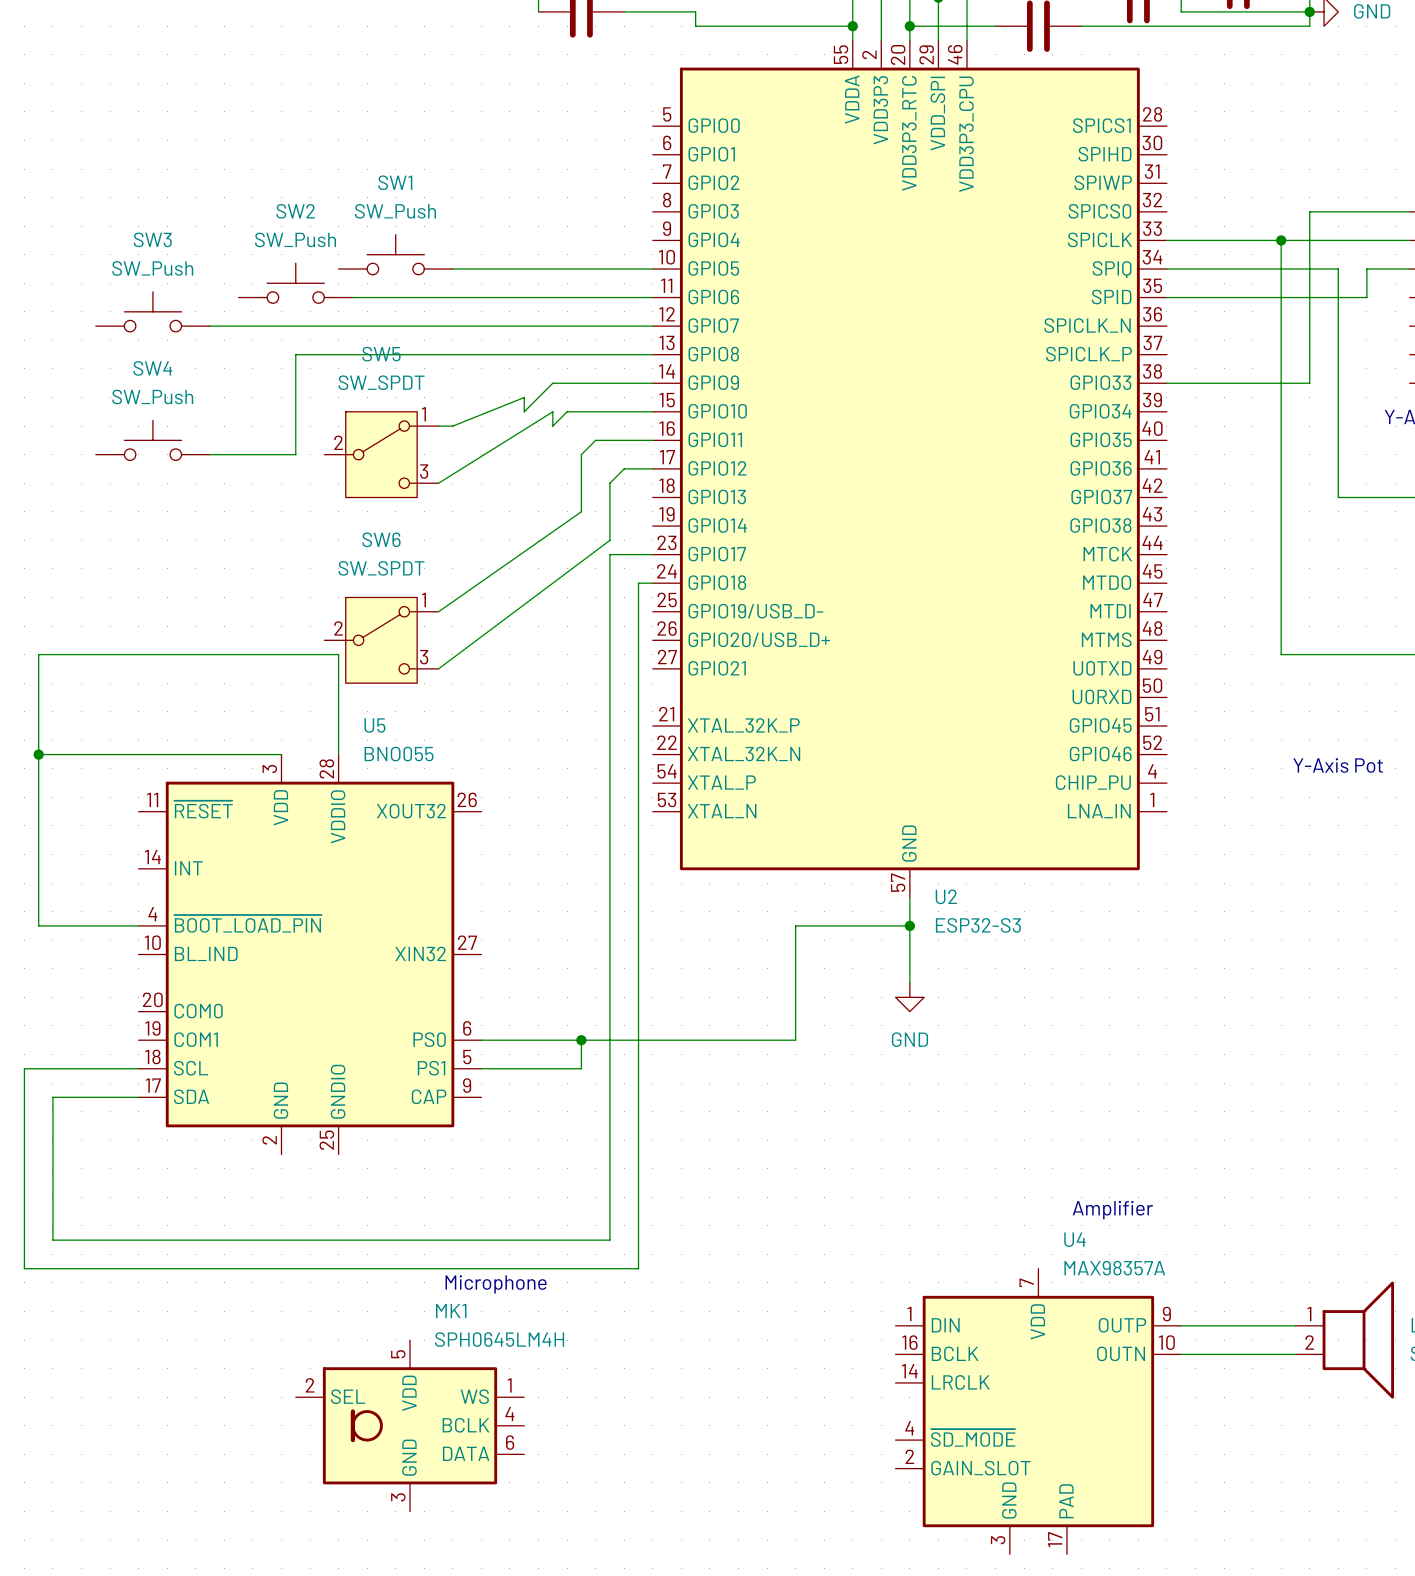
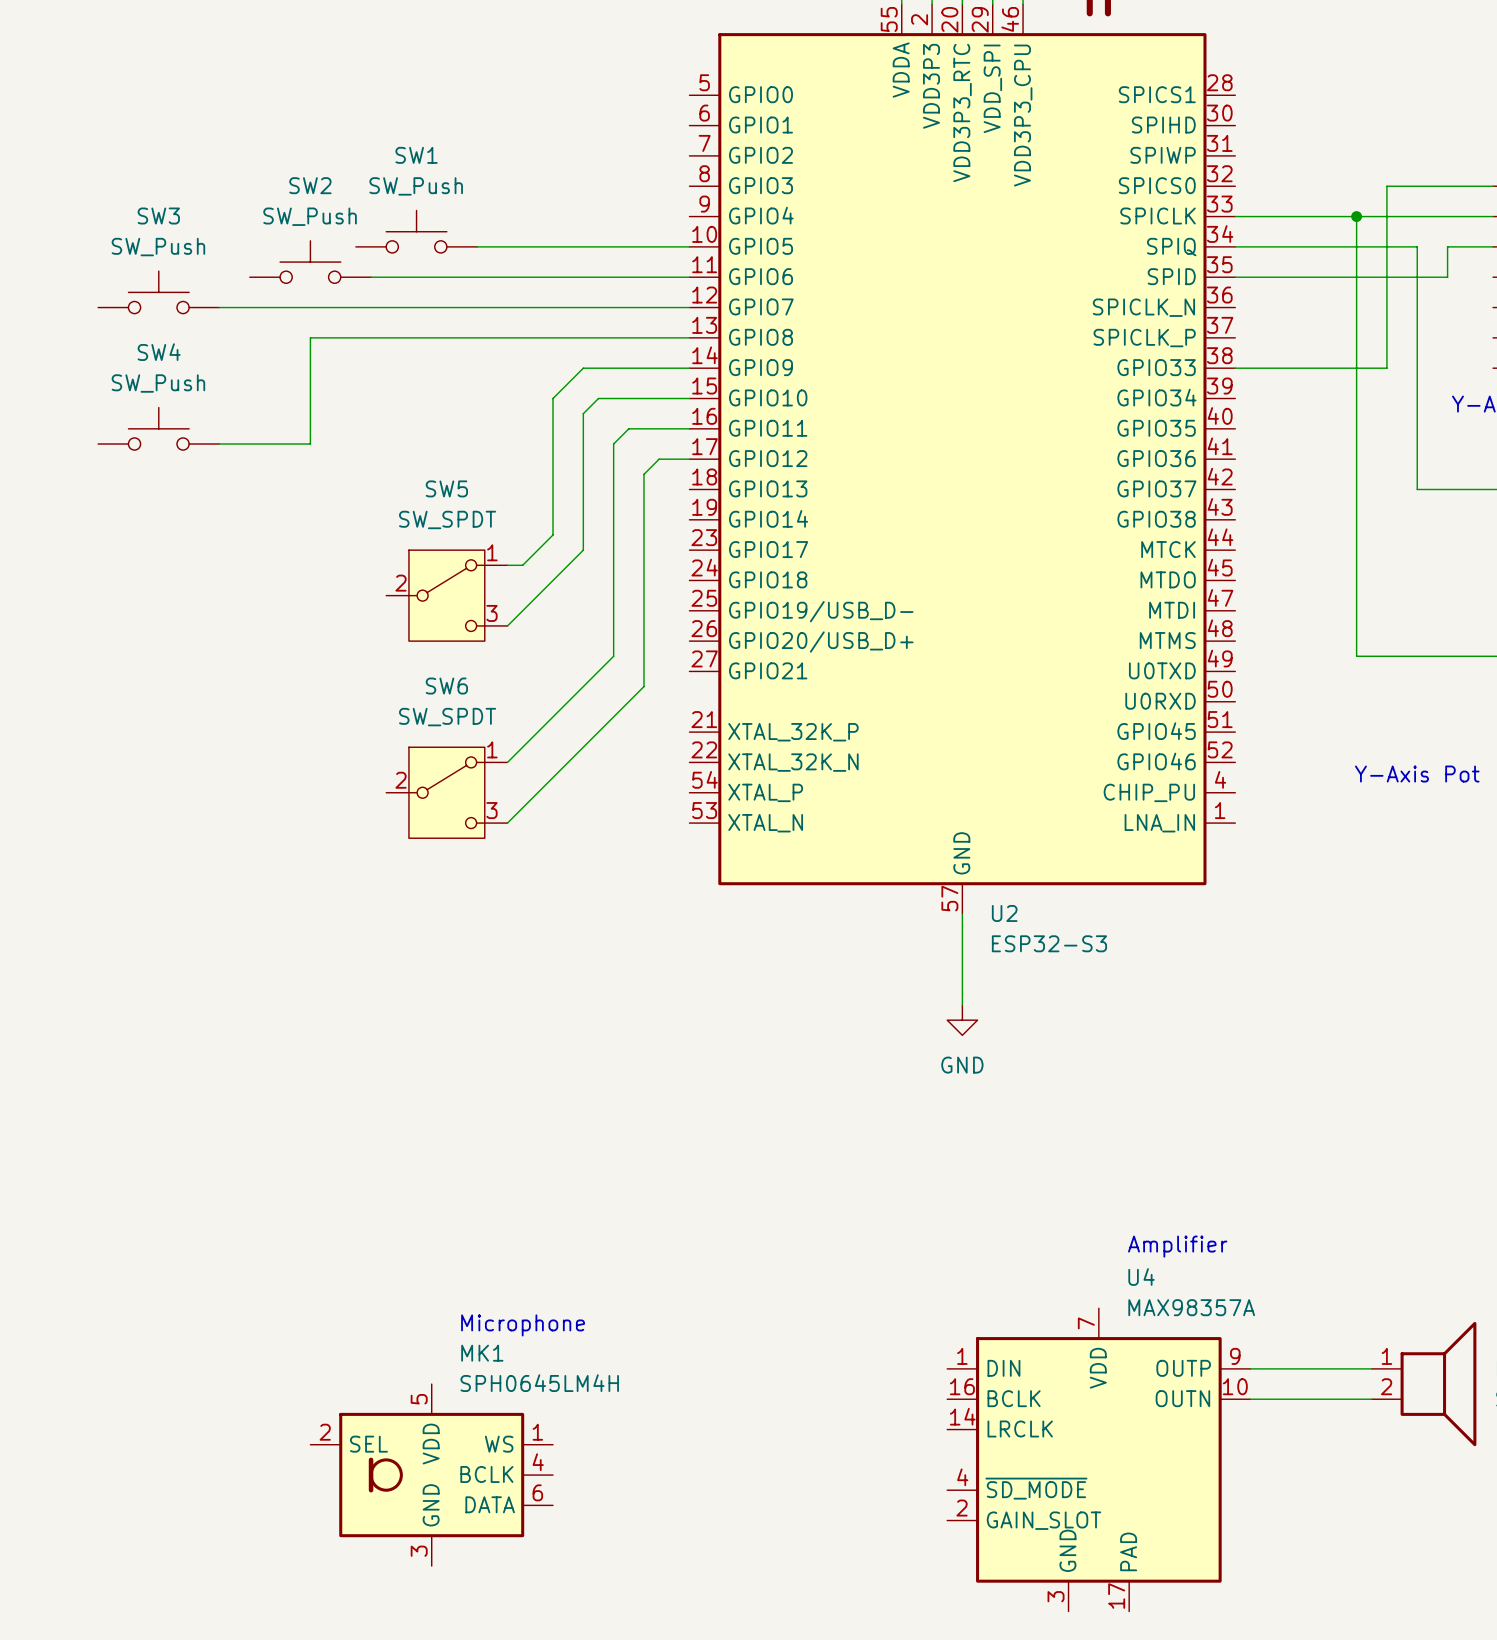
wire: (524, 411) (524, 397) (452, 426) (438, 426) -> (553, 398) (553, 534) (522, 565) (507, 565)
wire: (552, 426) (552, 411) (438, 483) -> (583, 413) (583, 550) (507, 625)
SW5 position: (381, 454) -> (446, 595)
wire: (581, 511) (438, 611) -> (613, 504) (613, 656) (507, 762)
wire: (609, 540) (438, 668) -> none
wire: (609, 554) (652, 554) -> (643, 550) (643, 534)
wire: (652, 583) (638, 583) (638, 1268) (24, 1268) (24, 1068) (138, 1068) -> none
SW6 position: (381, 640) -> (446, 792)
wire: (609, 683) (609, 1240) (52, 1240) (52, 1097) (138, 1097) -> (643, 686) (507, 823)
wire: (38, 754) (281, 754) -> none
junction: (38, 754) -> none
wire: (338, 754) (338, 654) (38, 654) (38, 925) (138, 925) -> none
wire: (909, 925) (795, 925) (795, 1040) (481, 1040) -> none
junction: (909, 925) -> none
U5: BNO055 (310, 954) -> none
wire: (581, 1040) (581, 1068) (481, 1068) -> none
junction: (581, 1040) -> none

